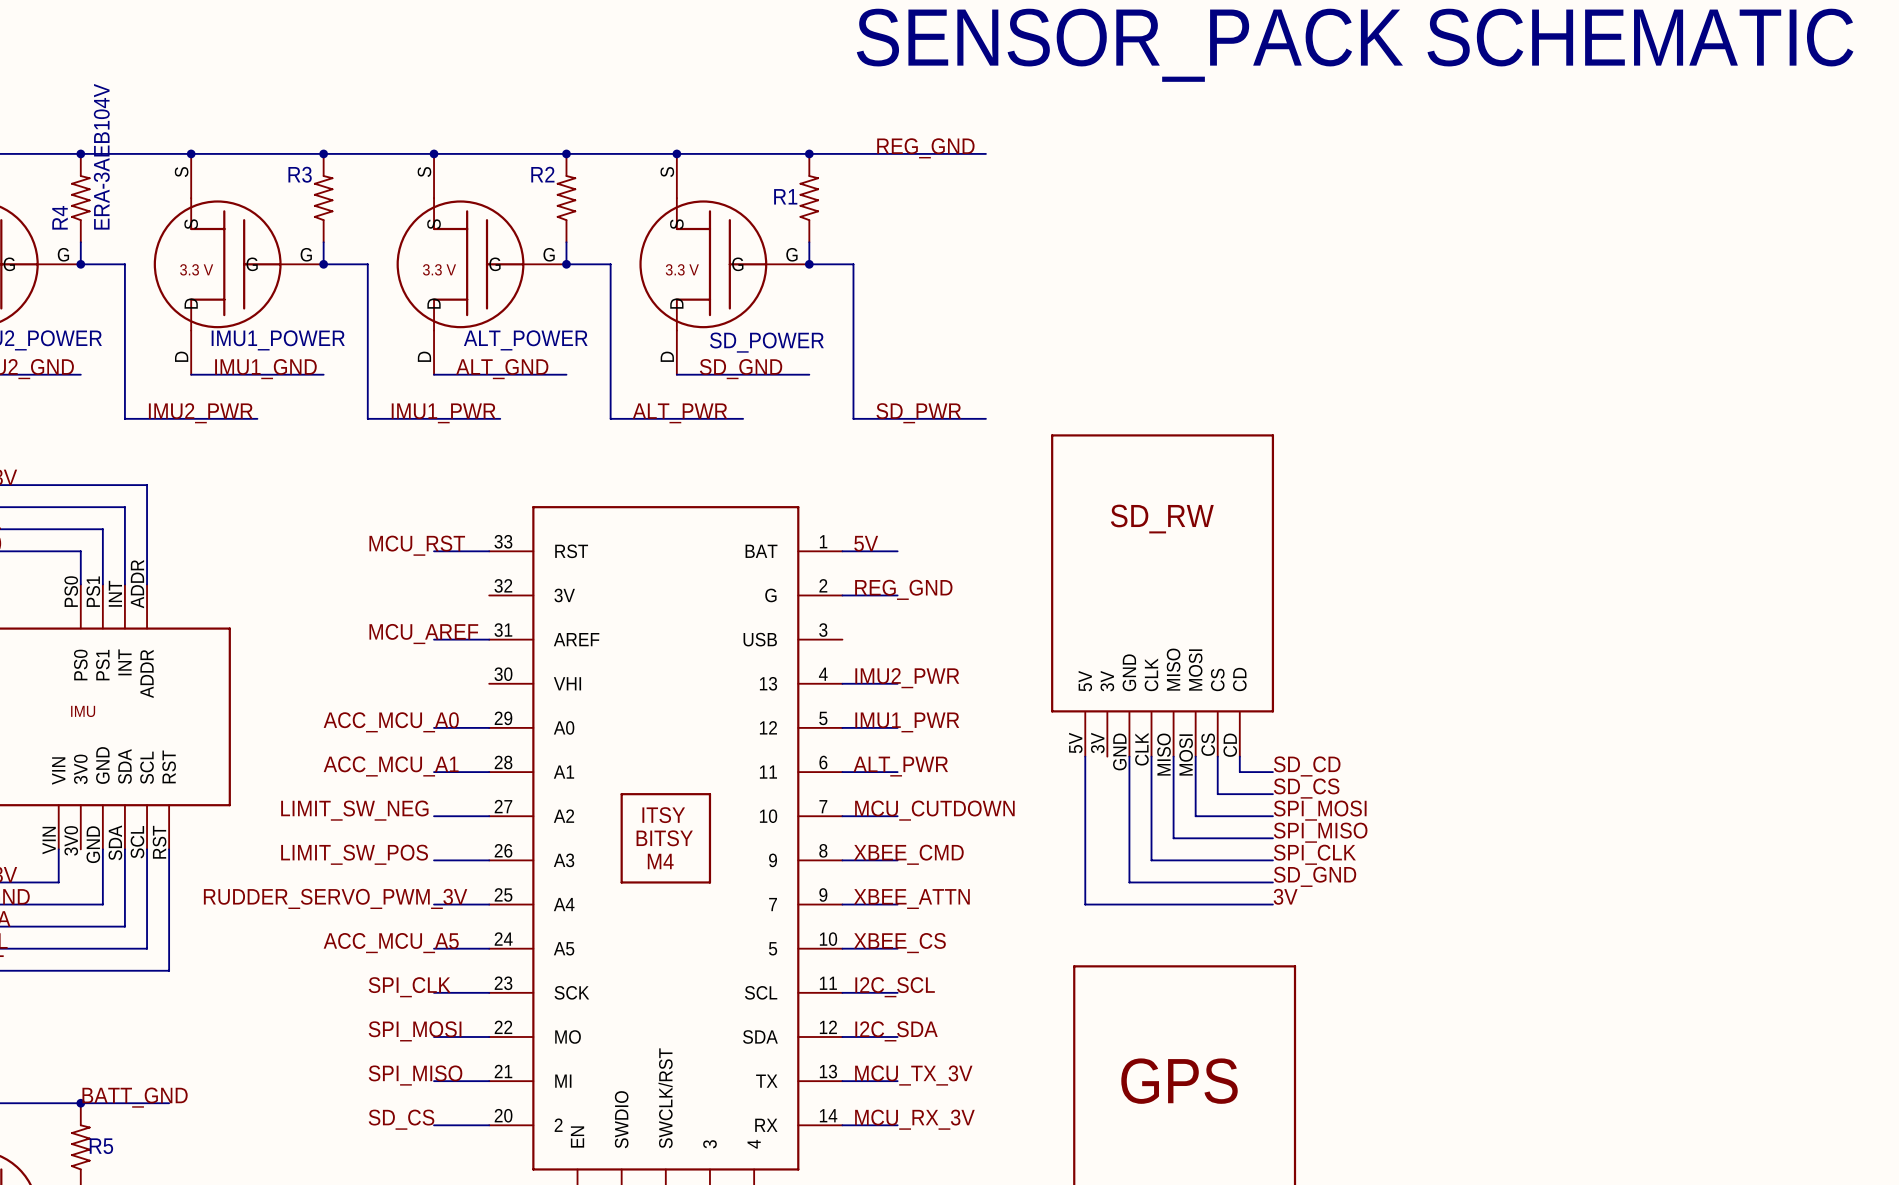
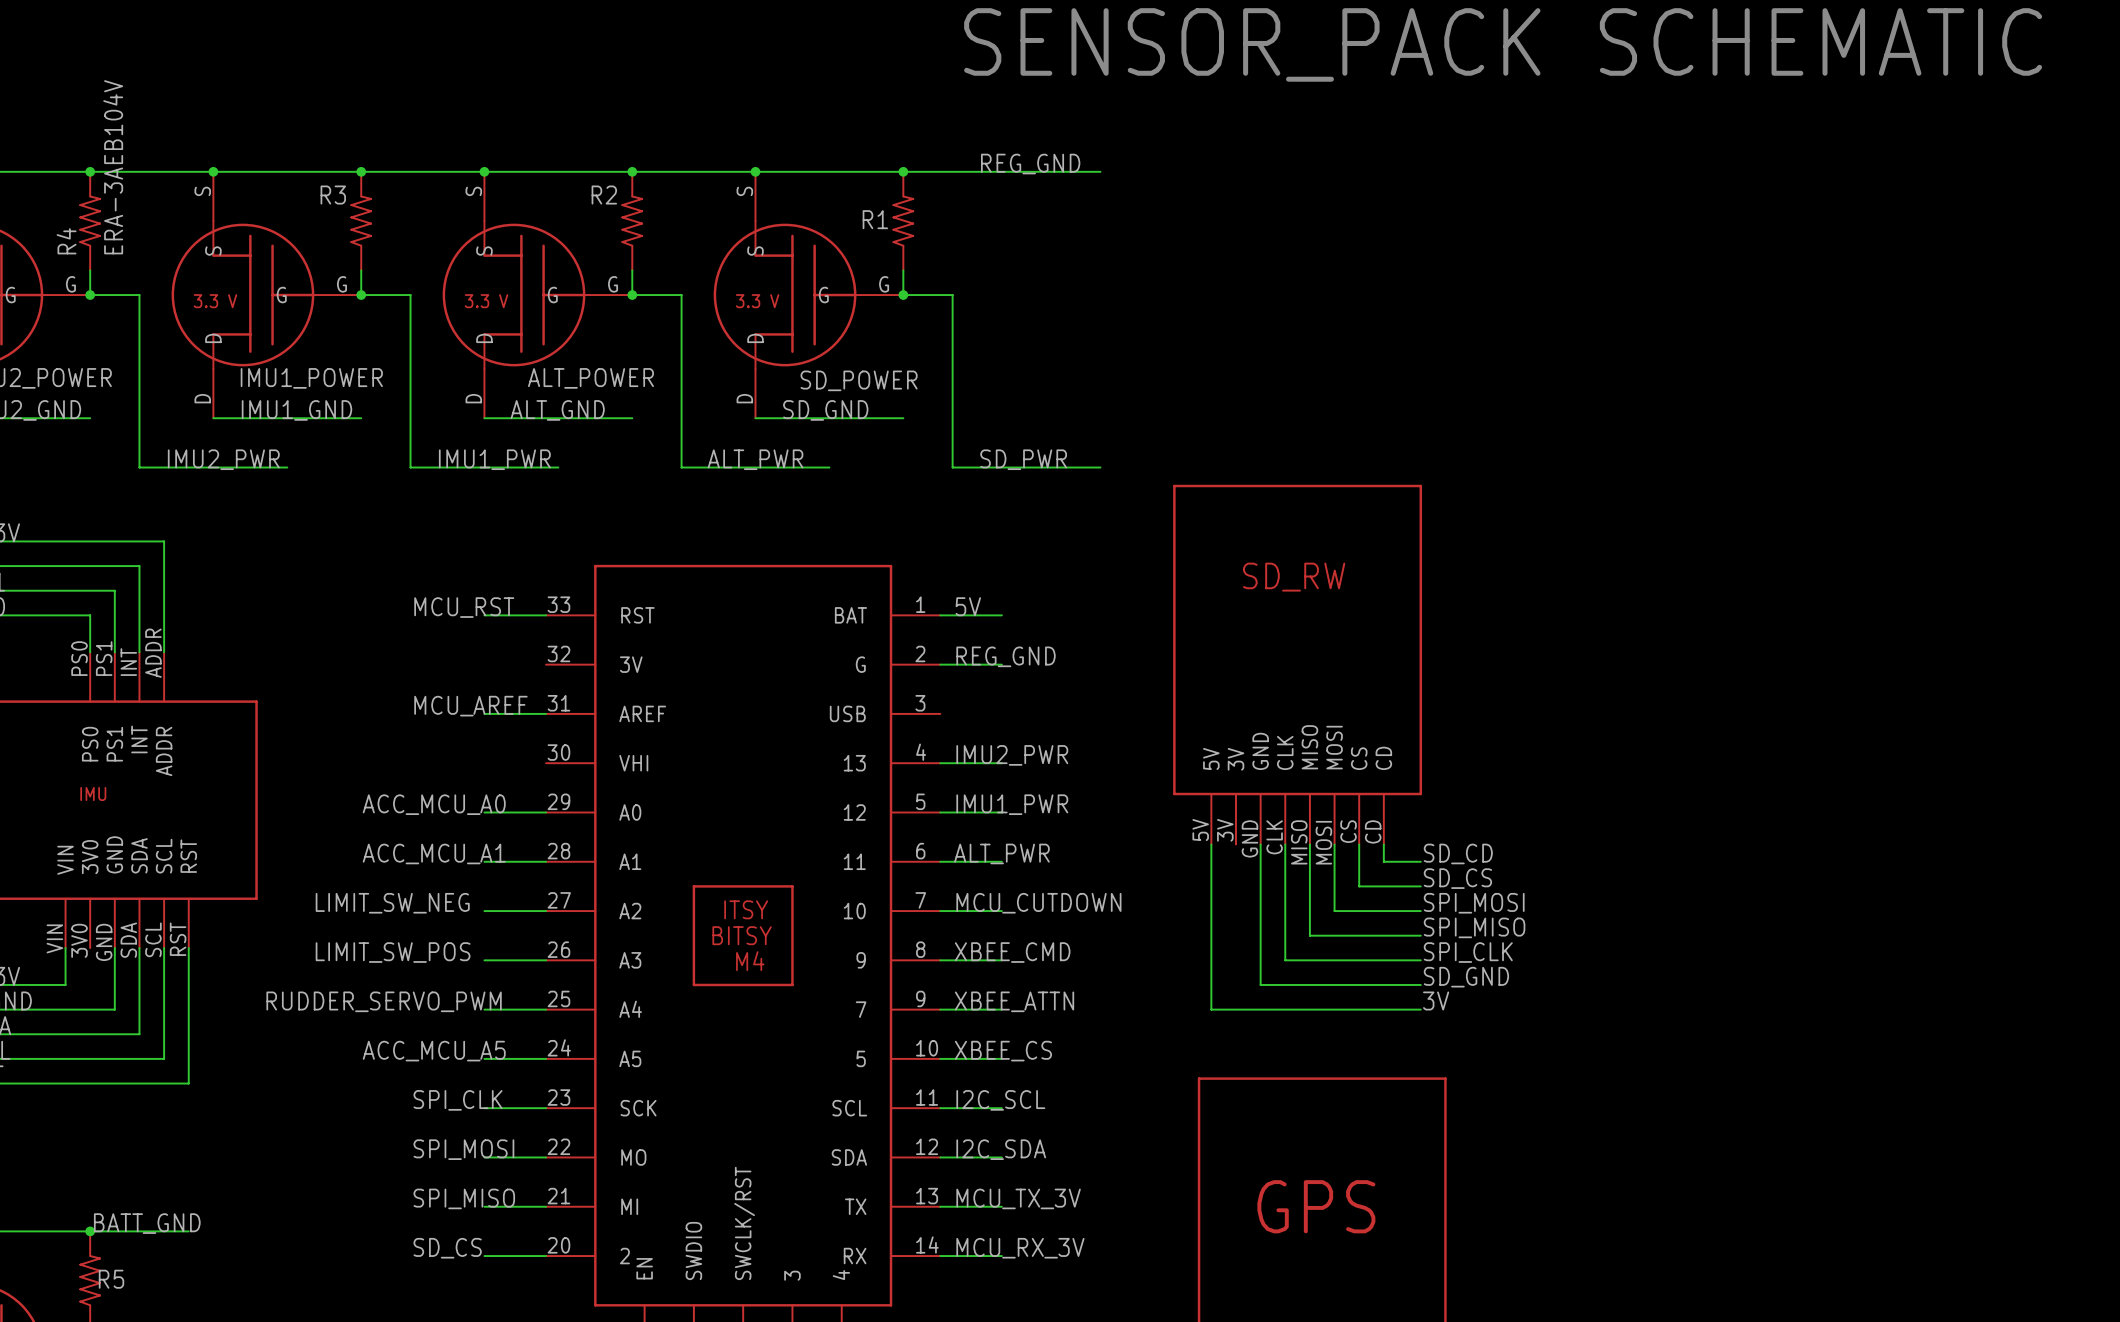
label: RUDDER_SERVO_PWM_3V (335, 898) -> RUDDER_SERVO_PWM (384, 1001)

